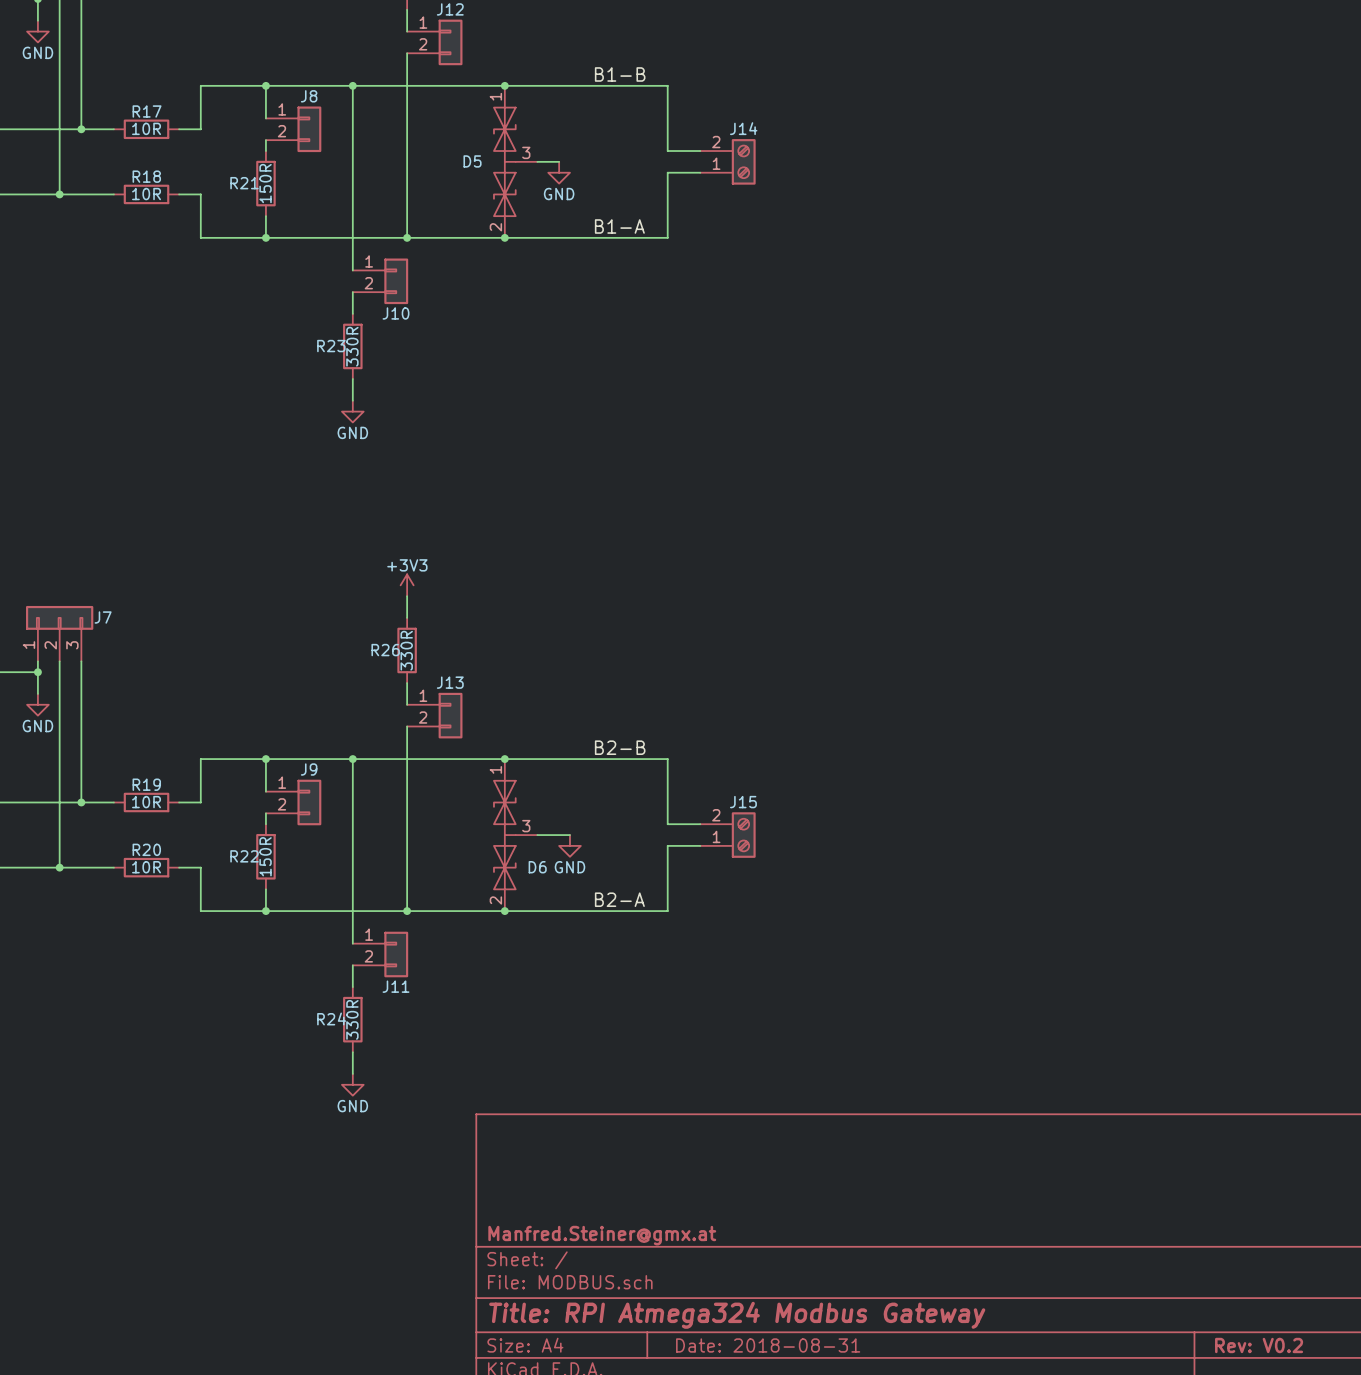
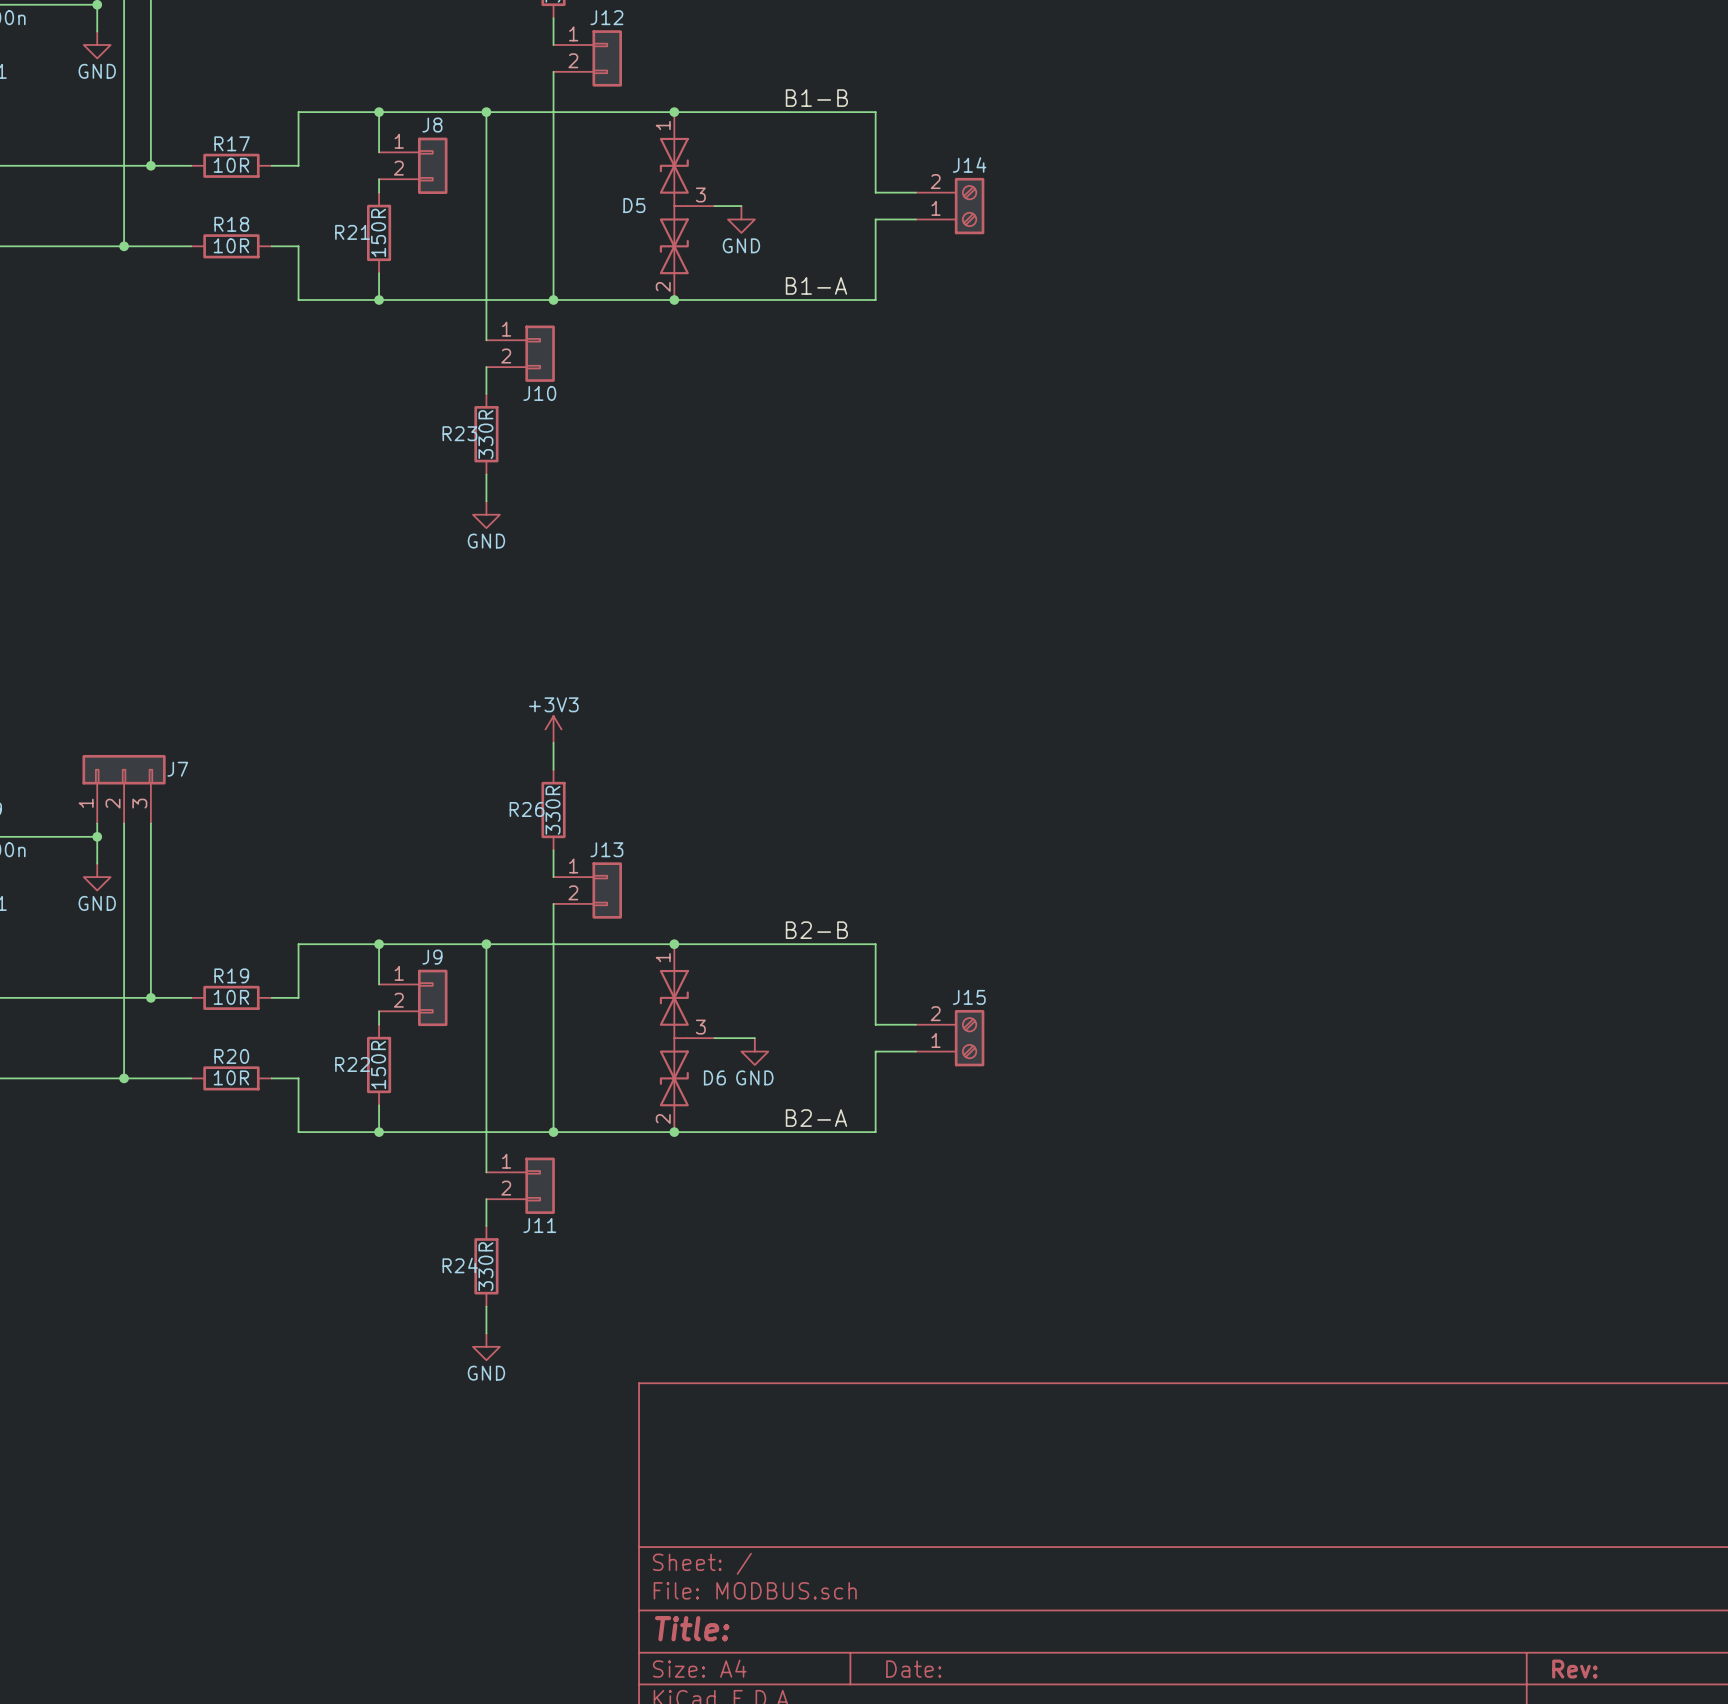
title block: Manfred.Steiner@gmx.at (602, 1235) -> none
title block: Title: RPI Atmega324 Modbus Gateway (737, 1315) -> Title: (692, 1628)
title block: Date: 2018-08-31 (768, 1345) -> Date: (913, 1669)
title block: Rev: V0.2 (1259, 1345) -> Rev: (1574, 1669)

